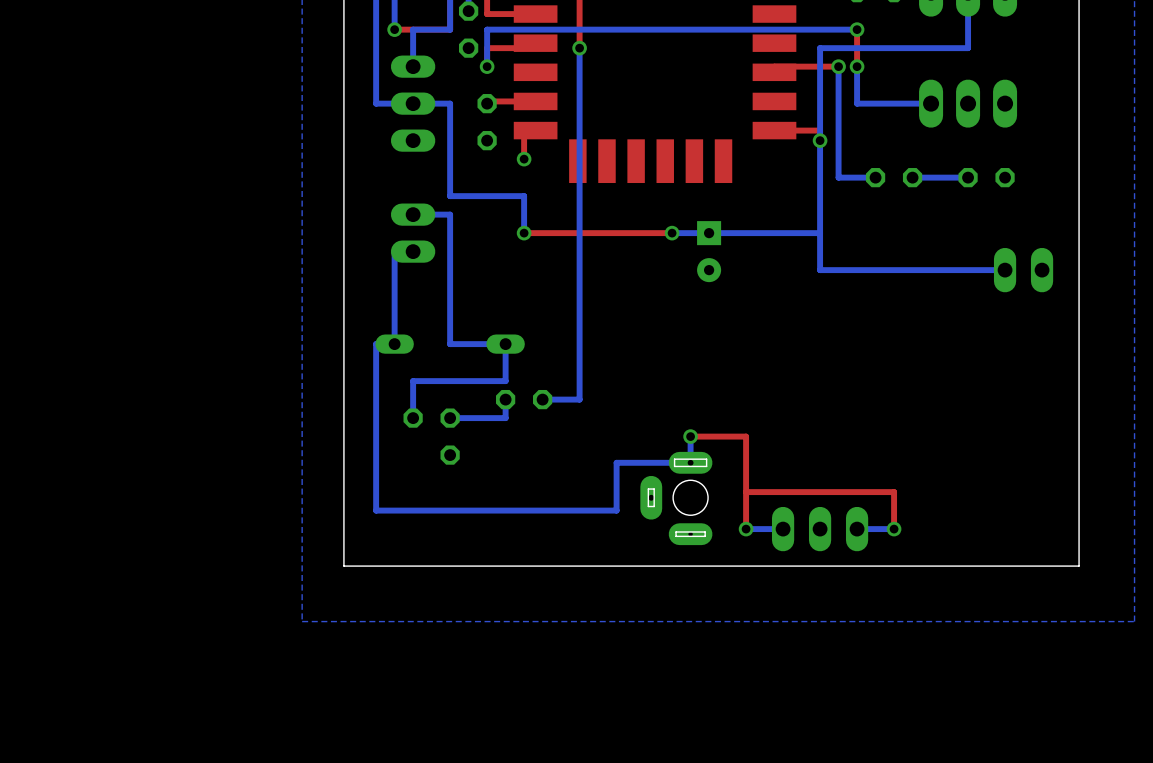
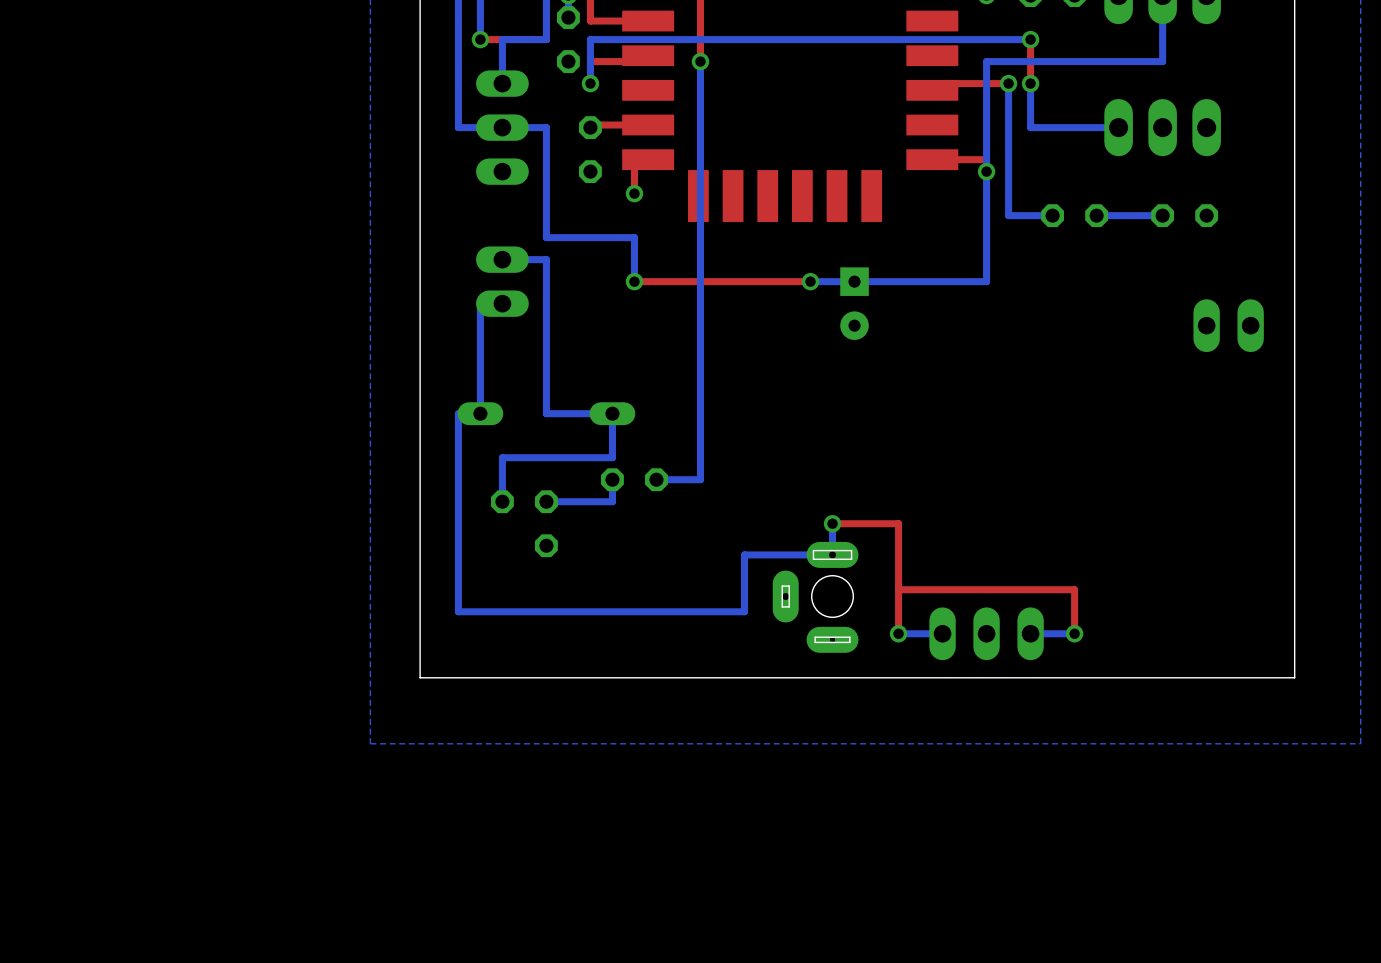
bottom track: (820, 233) (820, 270) (1005, 270) -> none

